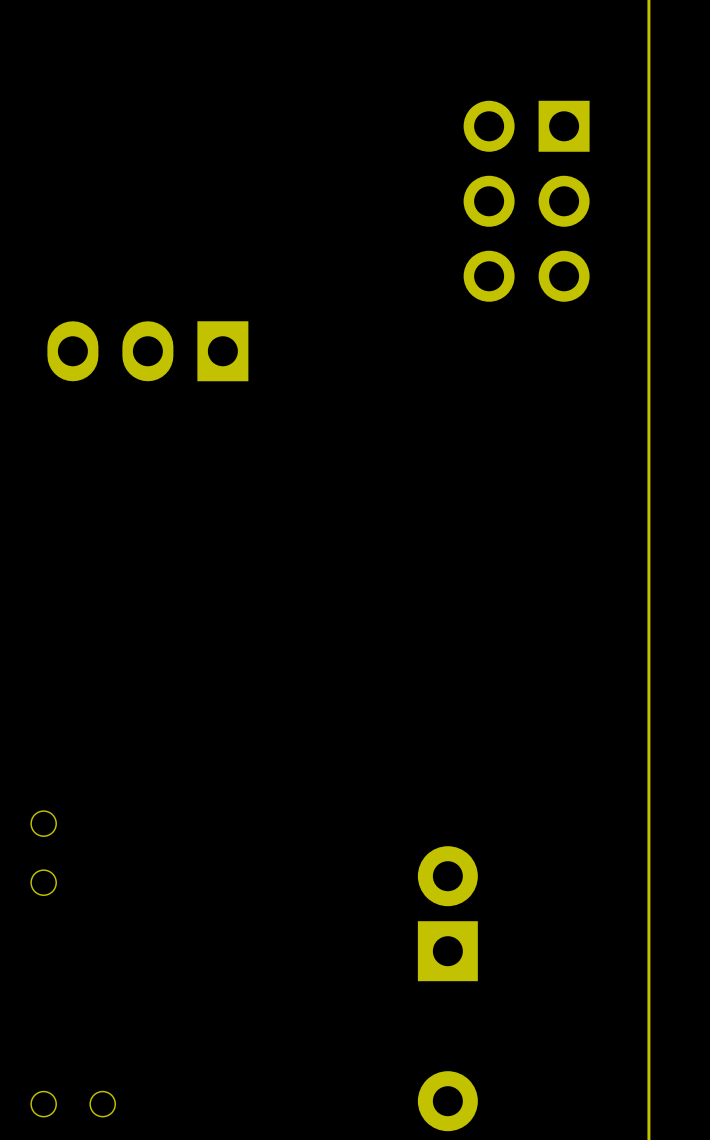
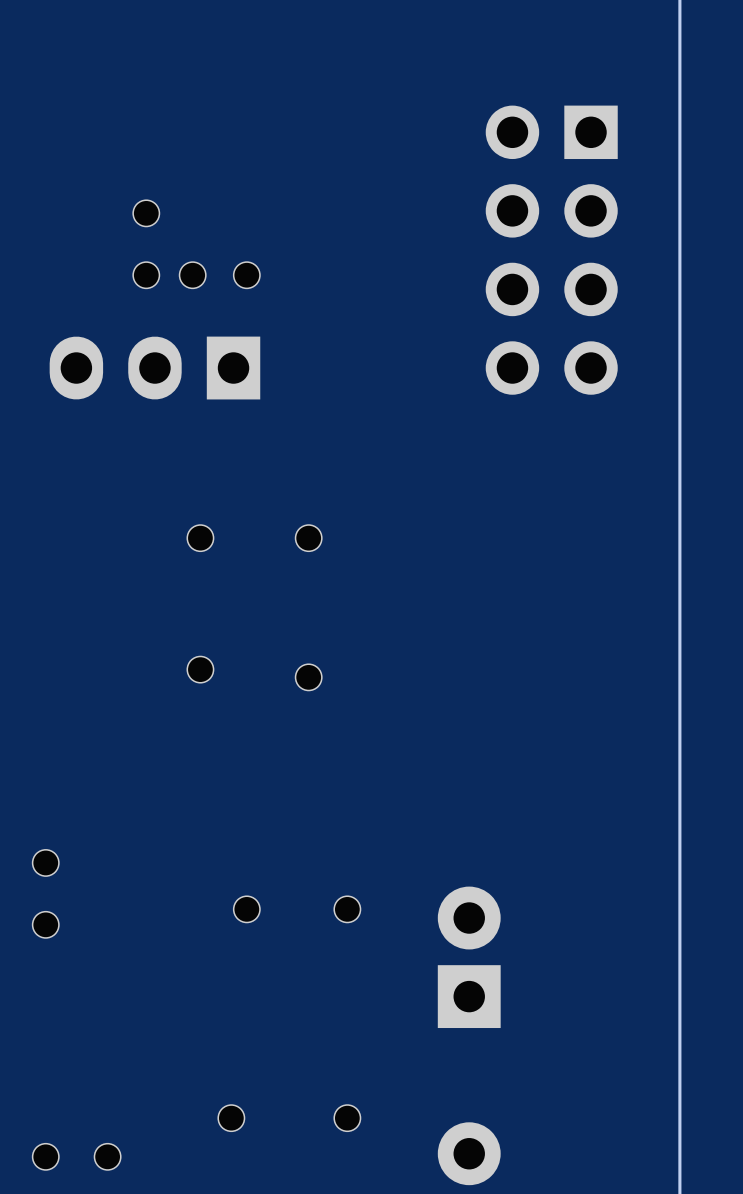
part: none -> (146, 213)
part: none -> (551, 250)
part: none -> (146, 275)
part: none -> (192, 275)
part: none -> (246, 275)
part: none -> (200, 538)
part: none -> (308, 538)
part: none -> (200, 669)
part: none -> (308, 677)
part: none -> (246, 909)
part: none -> (347, 909)
part: none -> (231, 1118)
part: none -> (347, 1118)

